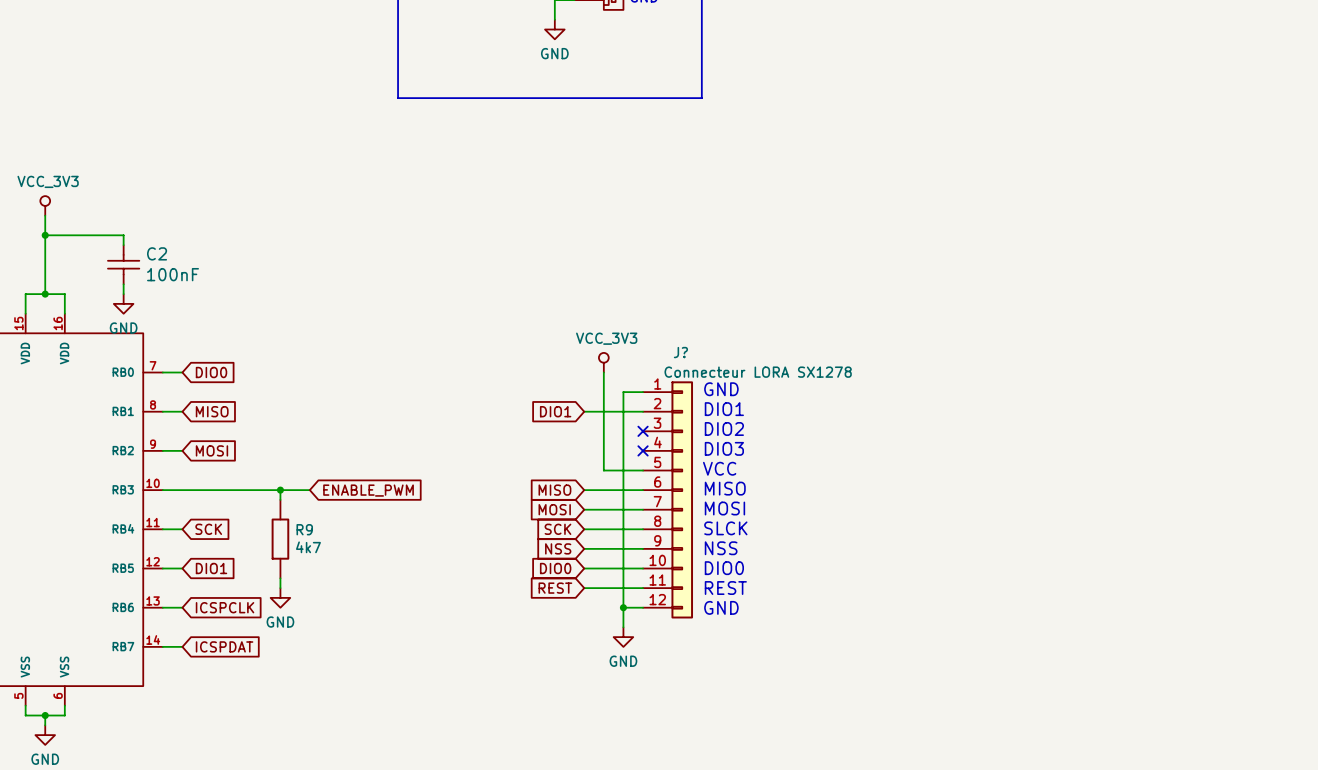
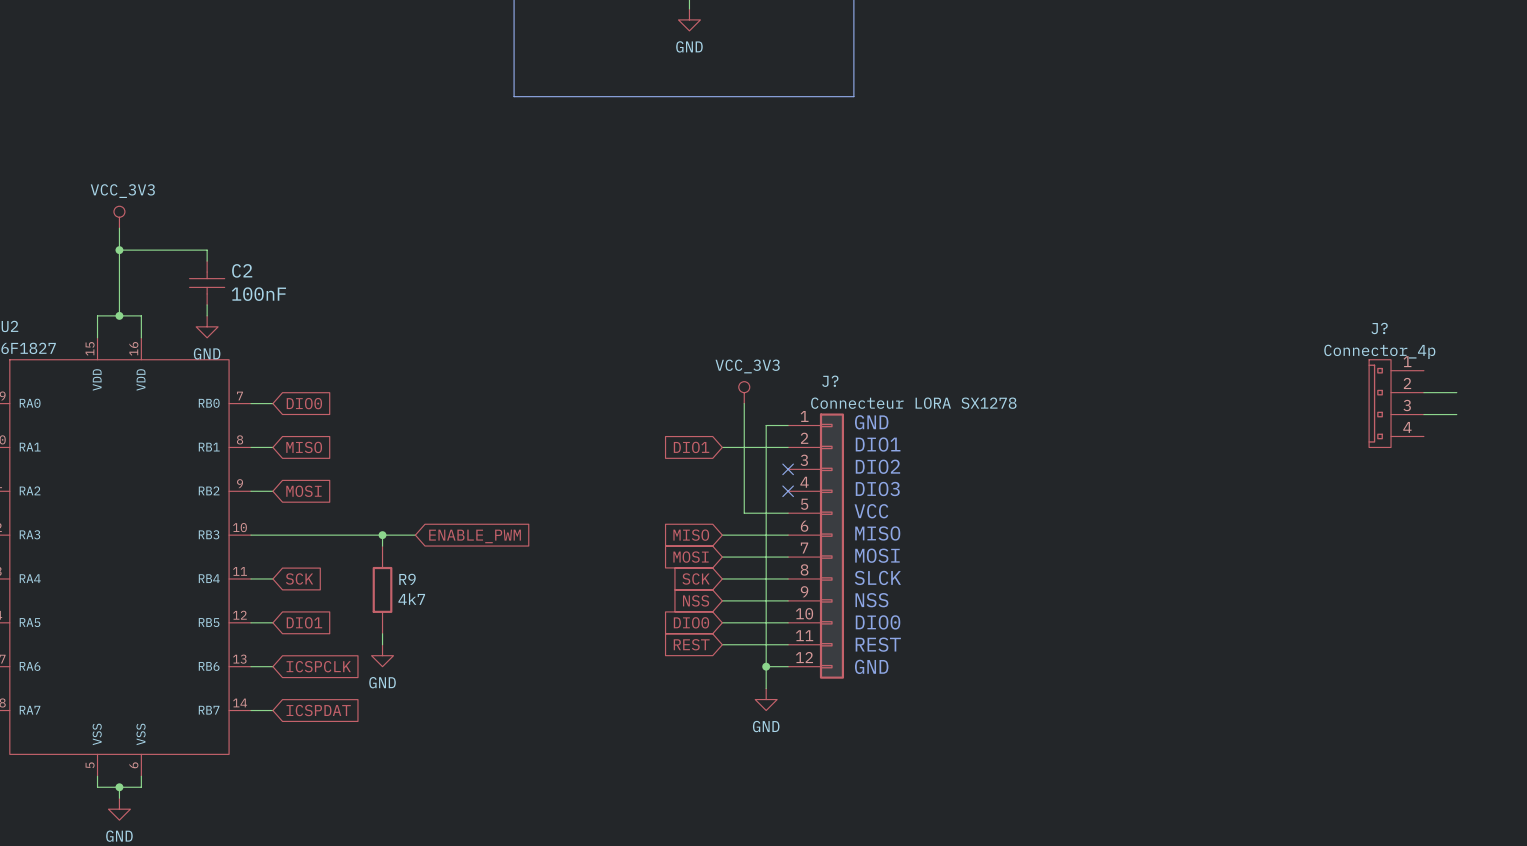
wire: none -> (1423, 392) (1456, 392)
J?: none -> Connector_4p (1396, 403)
wire: none -> (1423, 414) (1456, 414)

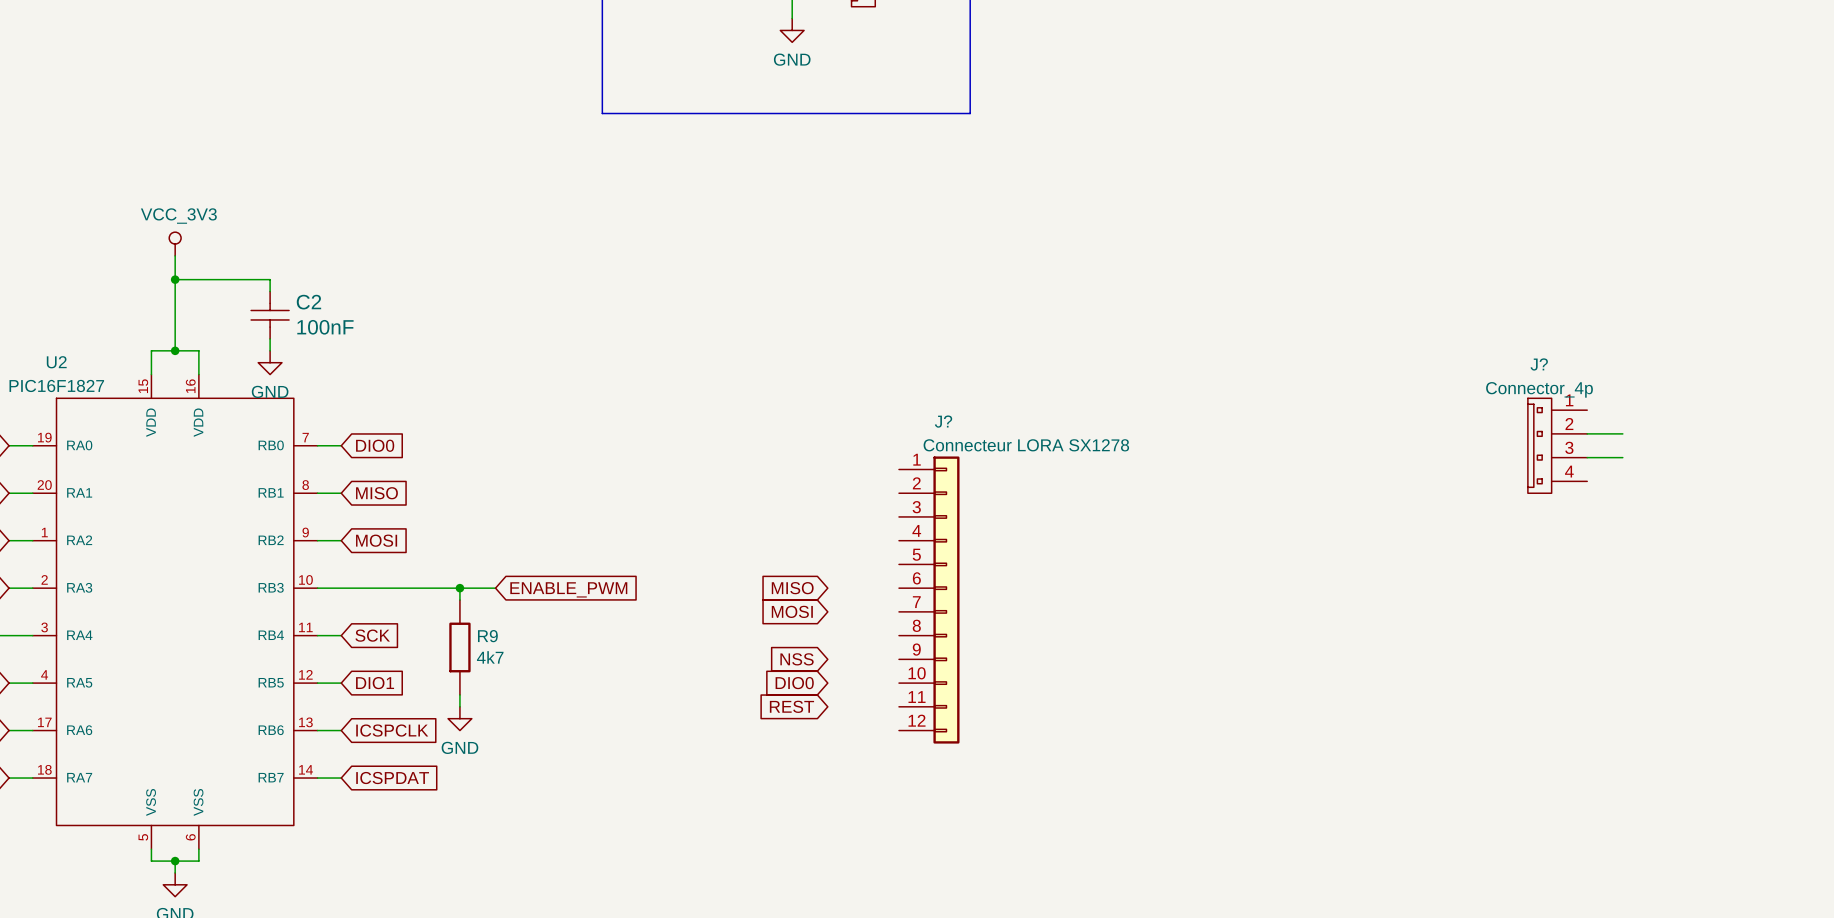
power symbol: VCC_3V3 (744, 392) -> none
wire: (744, 403) (744, 513) (788, 513) -> none
text: GND (871, 422) -> none
wire: (788, 425) (766, 425) (766, 688) -> none
text: DIO1 (878, 444) -> none
global label: DIO1 (691, 447) -> none
wire: (722, 447) (788, 447) -> none
text: DIO2 (877, 466) -> none
no-connect mark: (788, 469) -> none
text: DIO3 (877, 489) -> none
no-connect mark: (788, 491) -> none
text: VCC (871, 511) -> none
text: MISO (877, 533) -> none
wire: (722, 535) (788, 535) -> none
text: MOSI (877, 555) -> none
wire: (722, 557) (788, 557) -> none
text: SLCK (877, 577) -> none
global label: SCK (696, 578) -> none
wire: (722, 578) (788, 578) -> none
wire: (722, 600) (788, 600) -> none
text: NSS (871, 600) -> none
wire: (722, 622) (788, 622) -> none
text: DIO0 (878, 622) -> none
wire: (722, 644) (788, 644) -> none
text: REST (878, 644) -> none
wire: (766, 666) (788, 666) -> none
junction: (766, 666) -> none
text: GND (871, 666) -> none
power symbol: GND (766, 699) -> none

